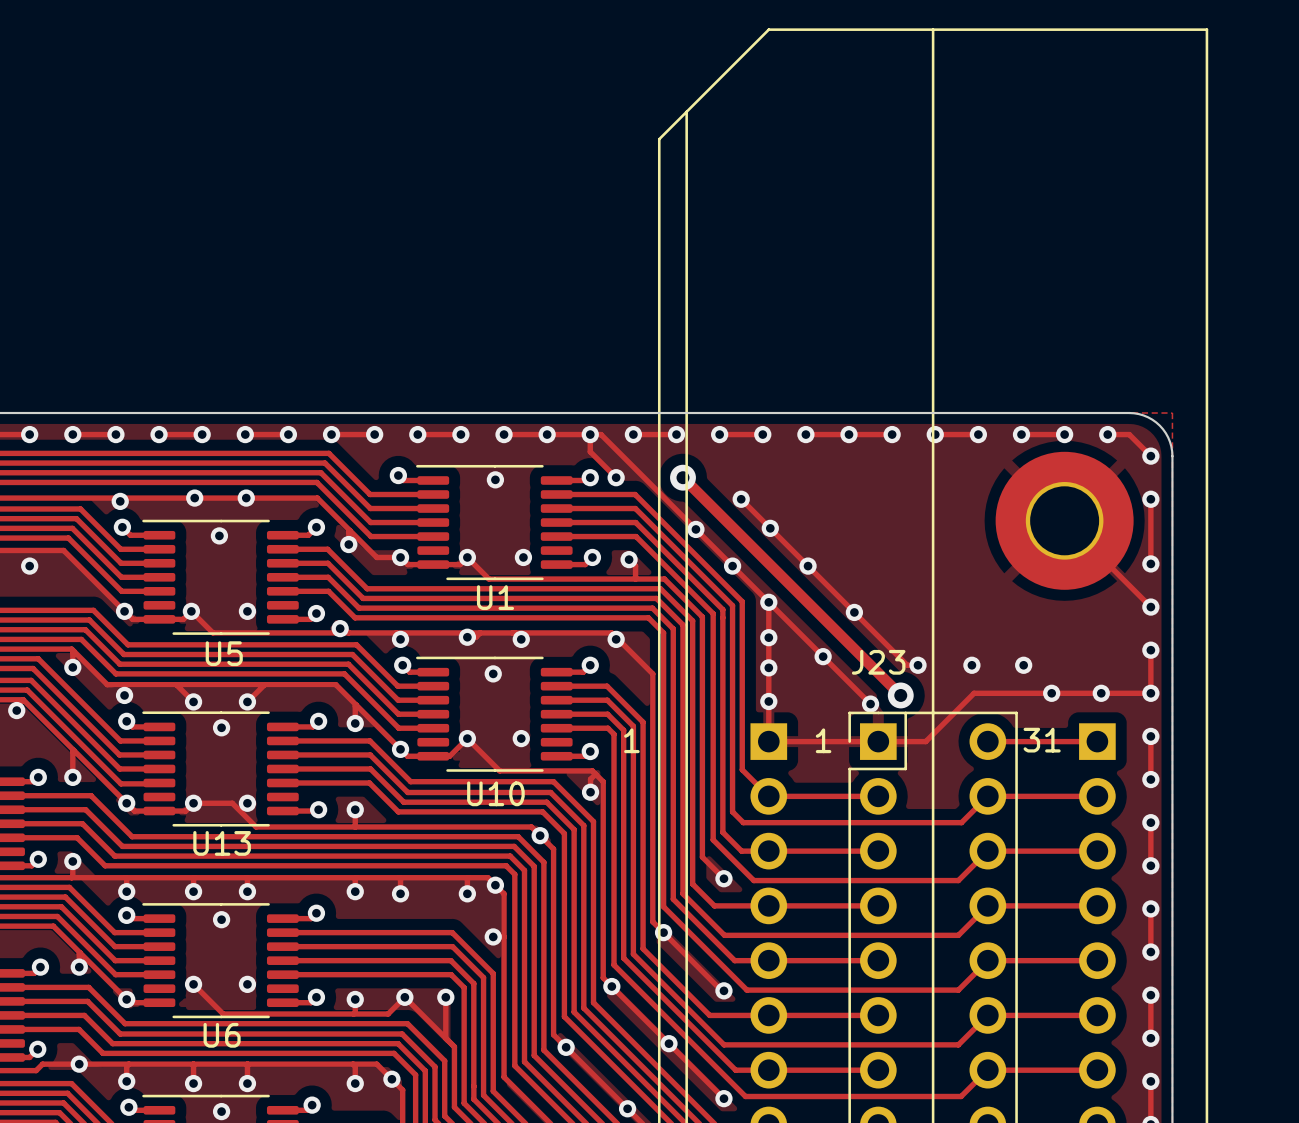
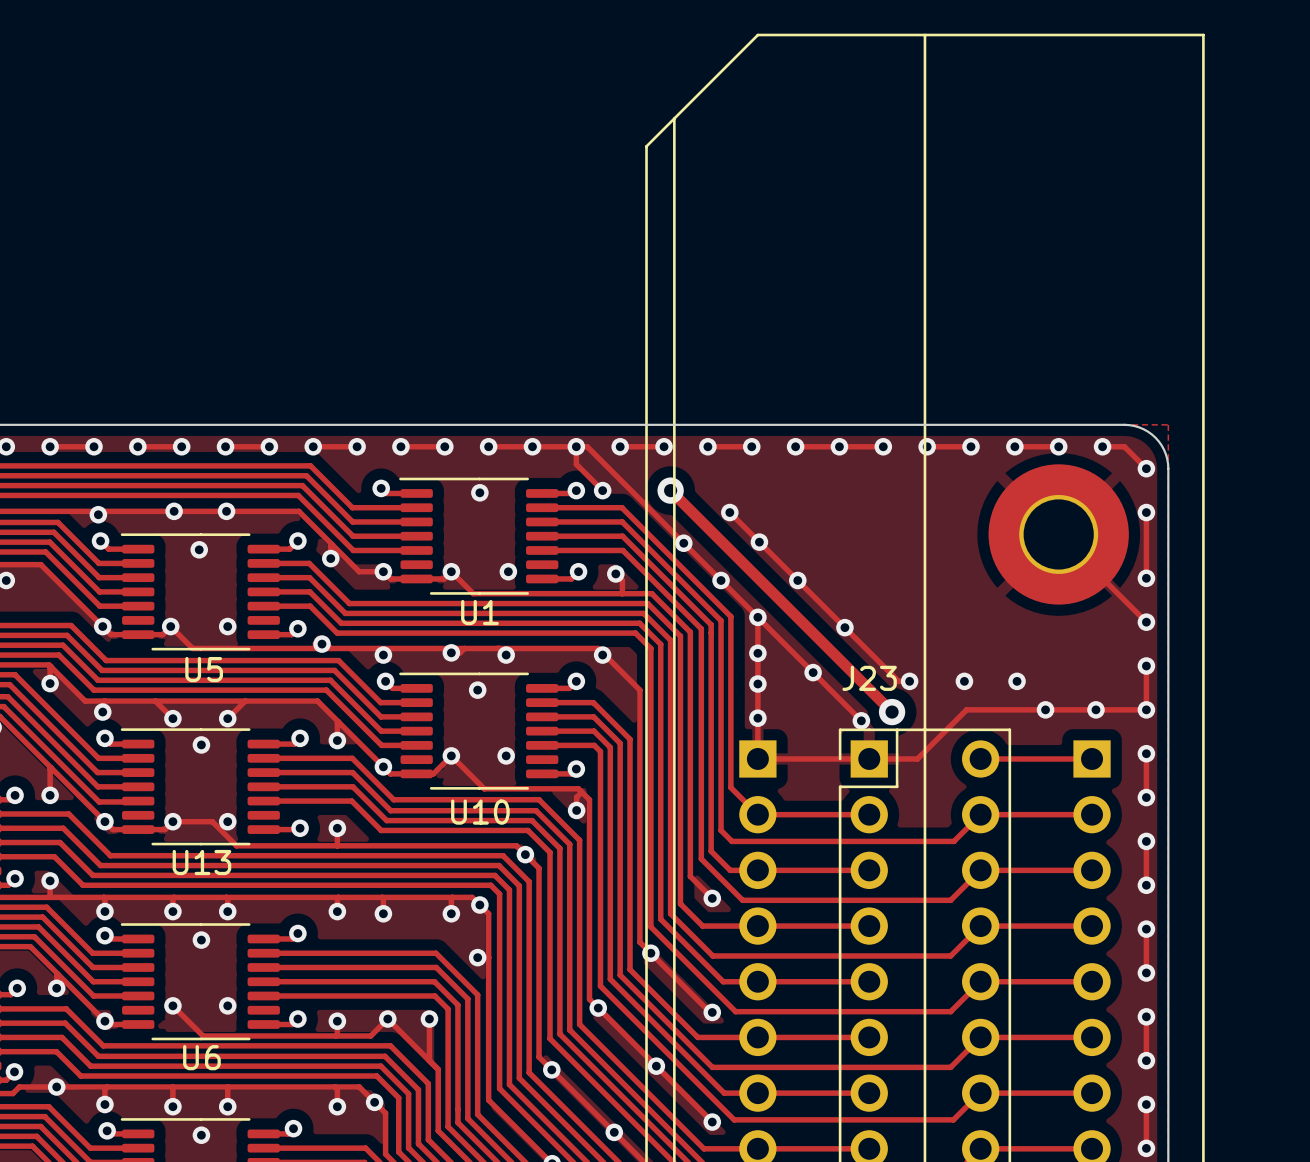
text: 1 (631, 740) -> none
text: 1 (823, 740) -> none
text: 31 (1042, 740) -> none

